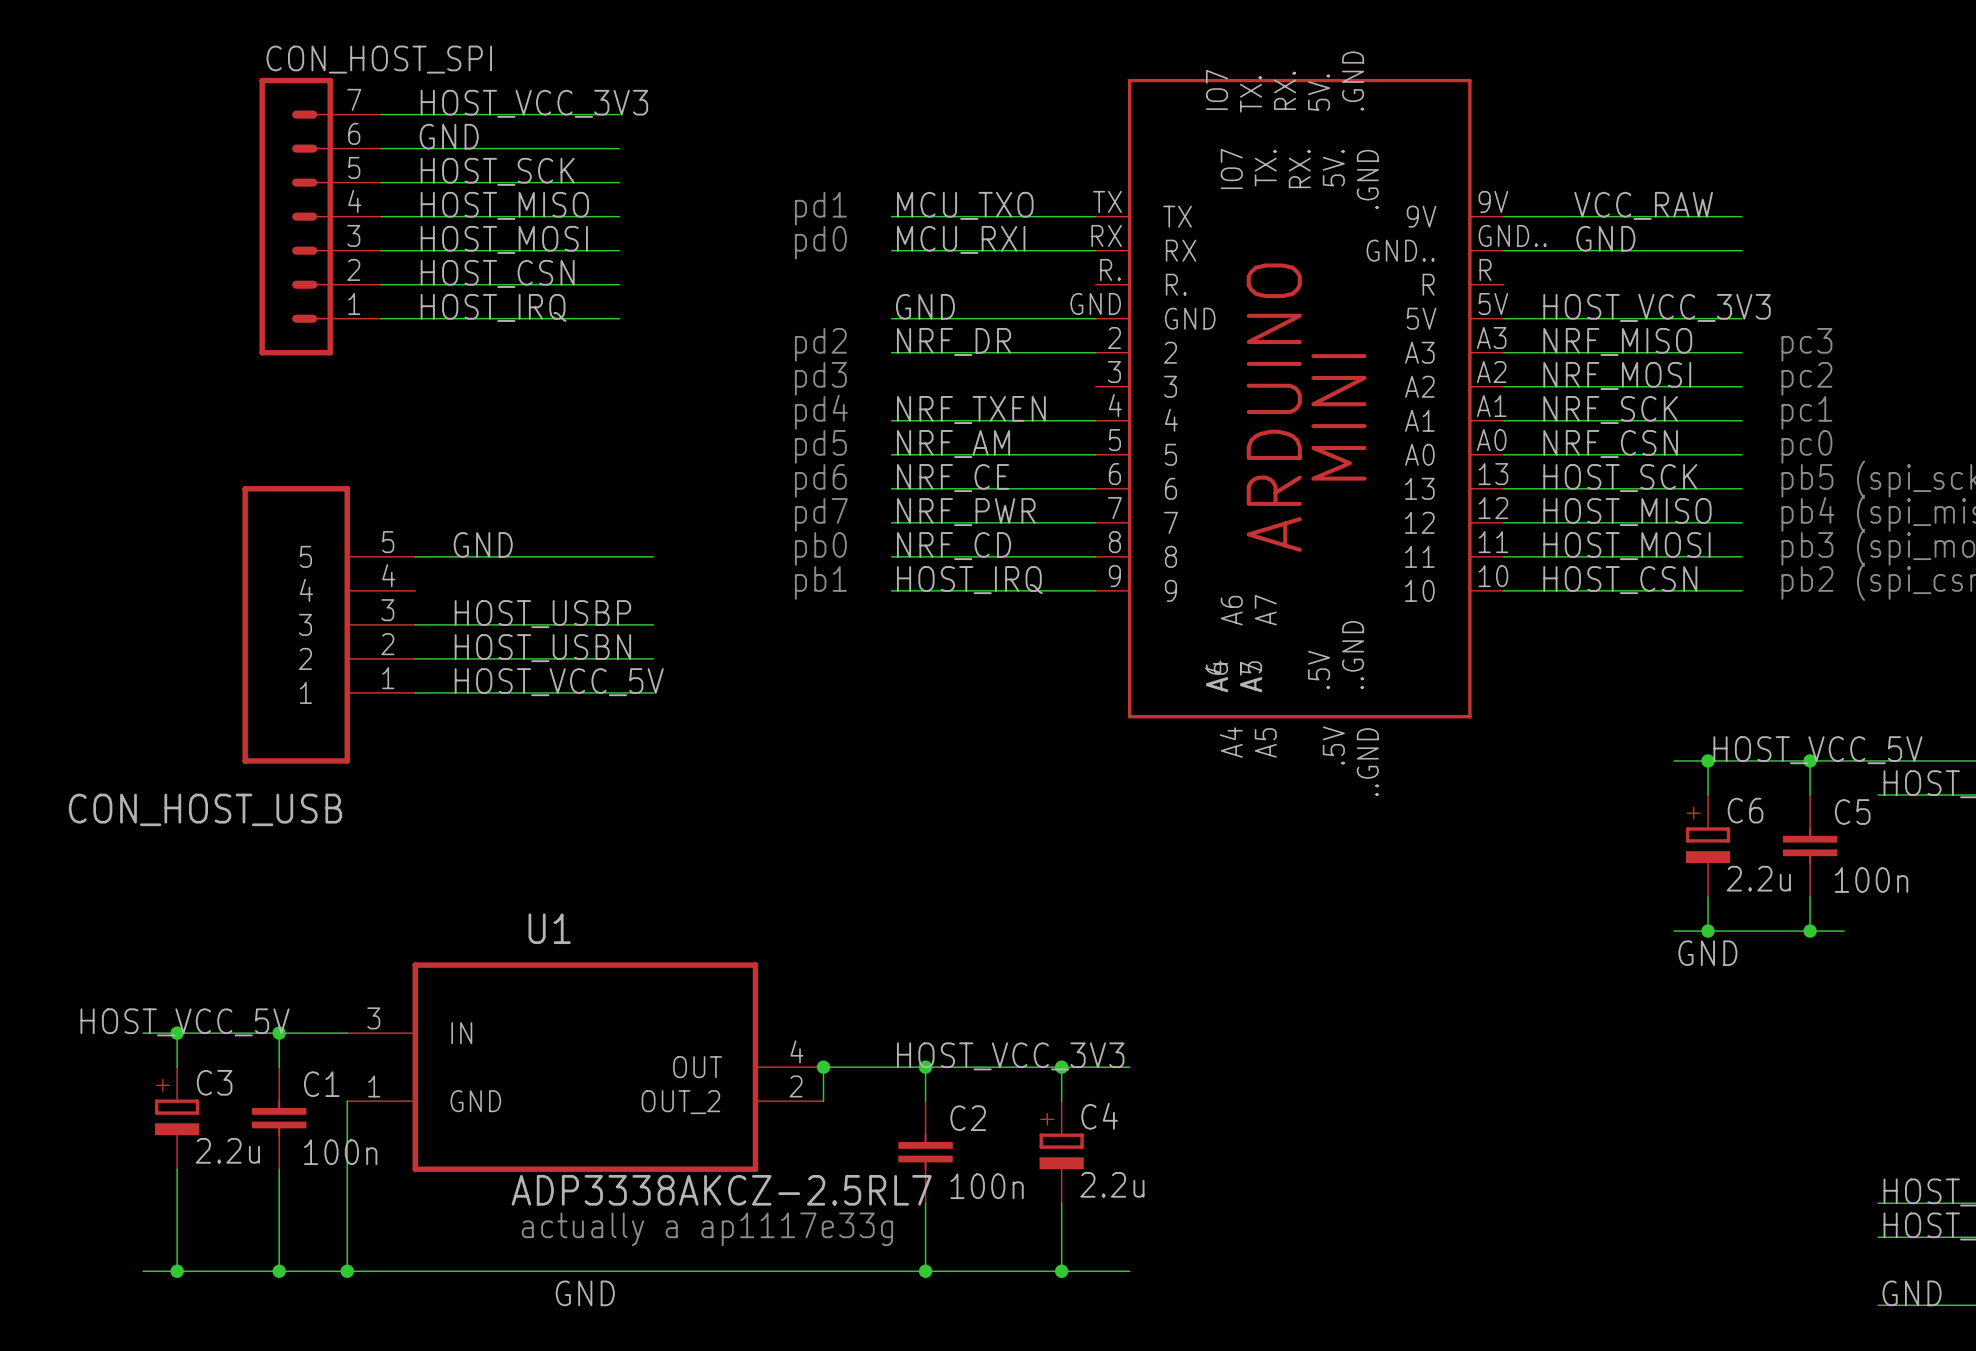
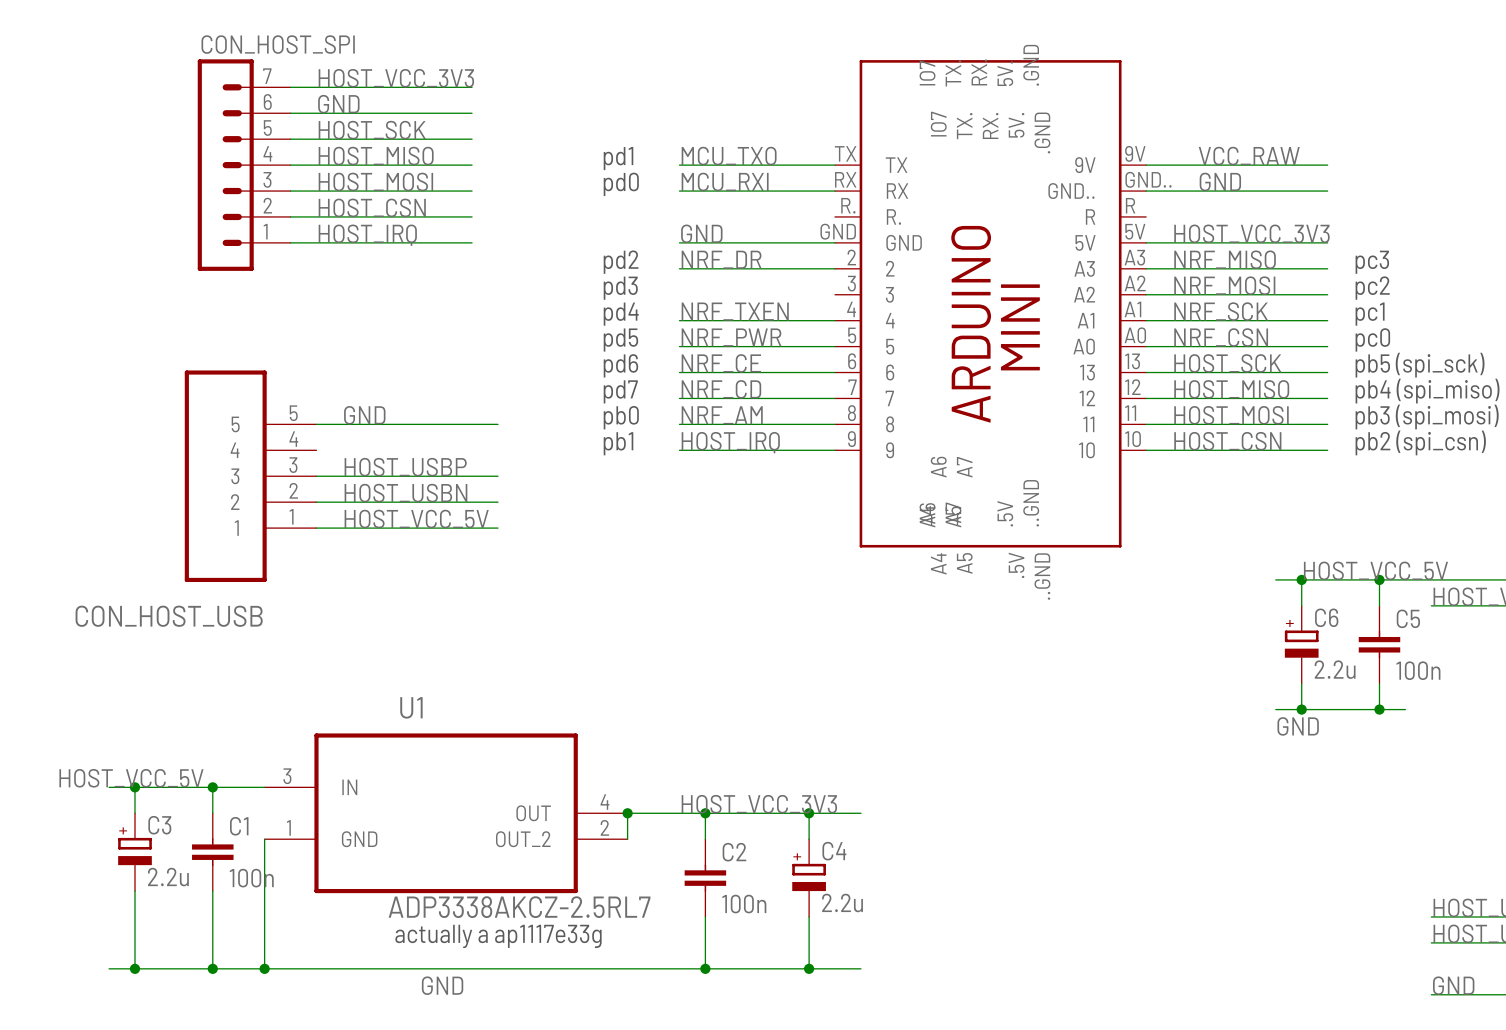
label: NRF_AM (953, 444) -> NRF_PWR (731, 337)
label: NRF_PWR (966, 512) -> NRF_CD (721, 389)
label: NRF_CD (954, 546) -> NRF_AM (722, 415)

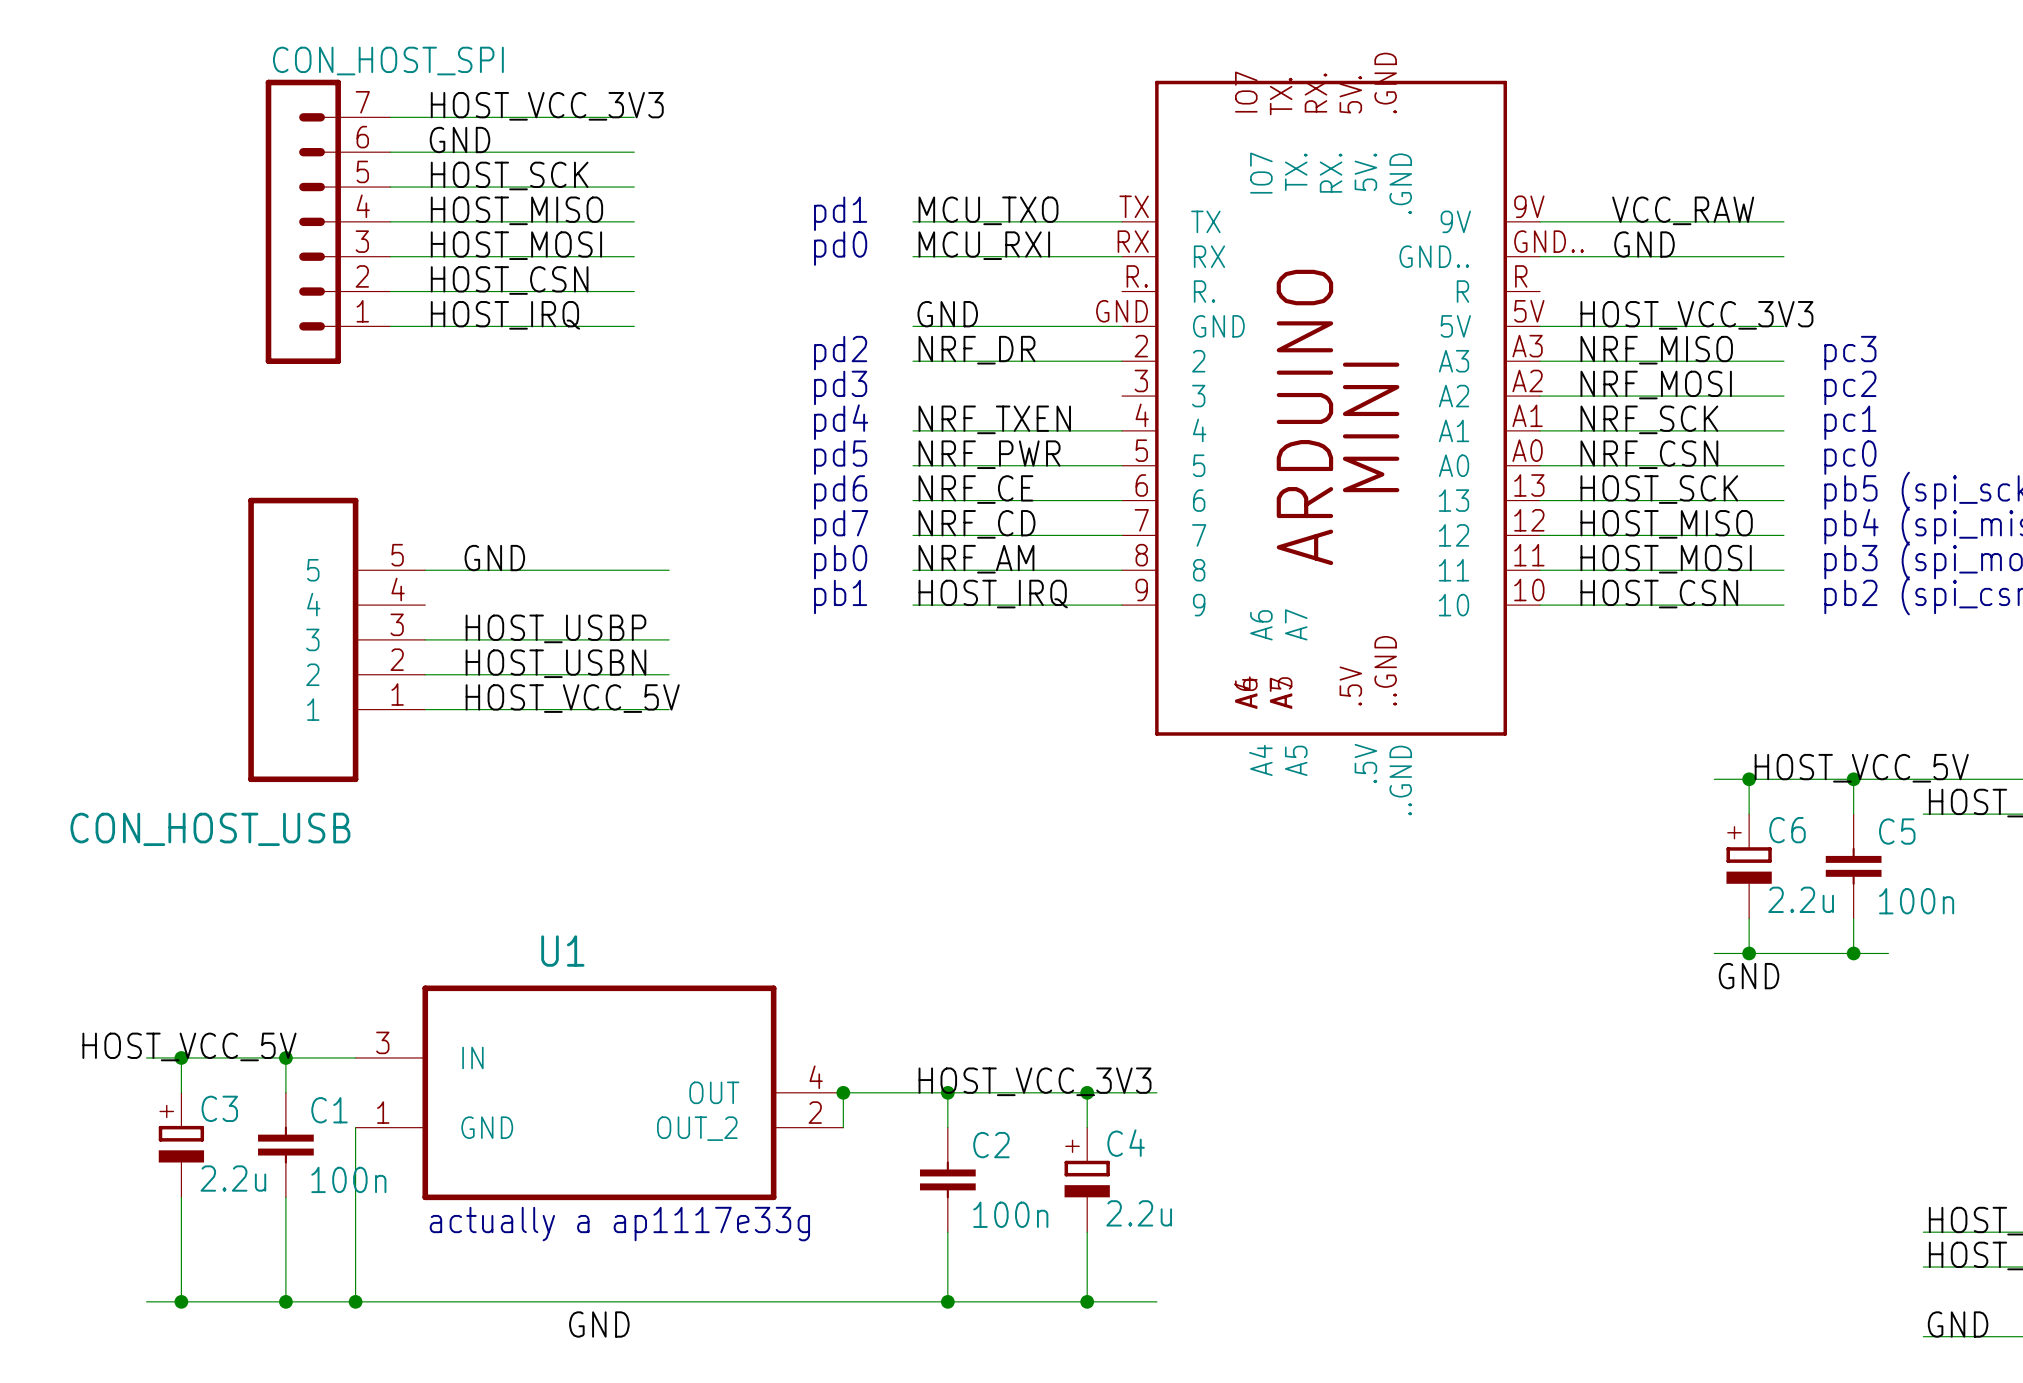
U1 value: ADP3338AKCZ-2.5RL7 (519, 907) -> none
text position: actually a ap1117e33g (498, 936) -> actually a ap1117e33g (619, 1224)

